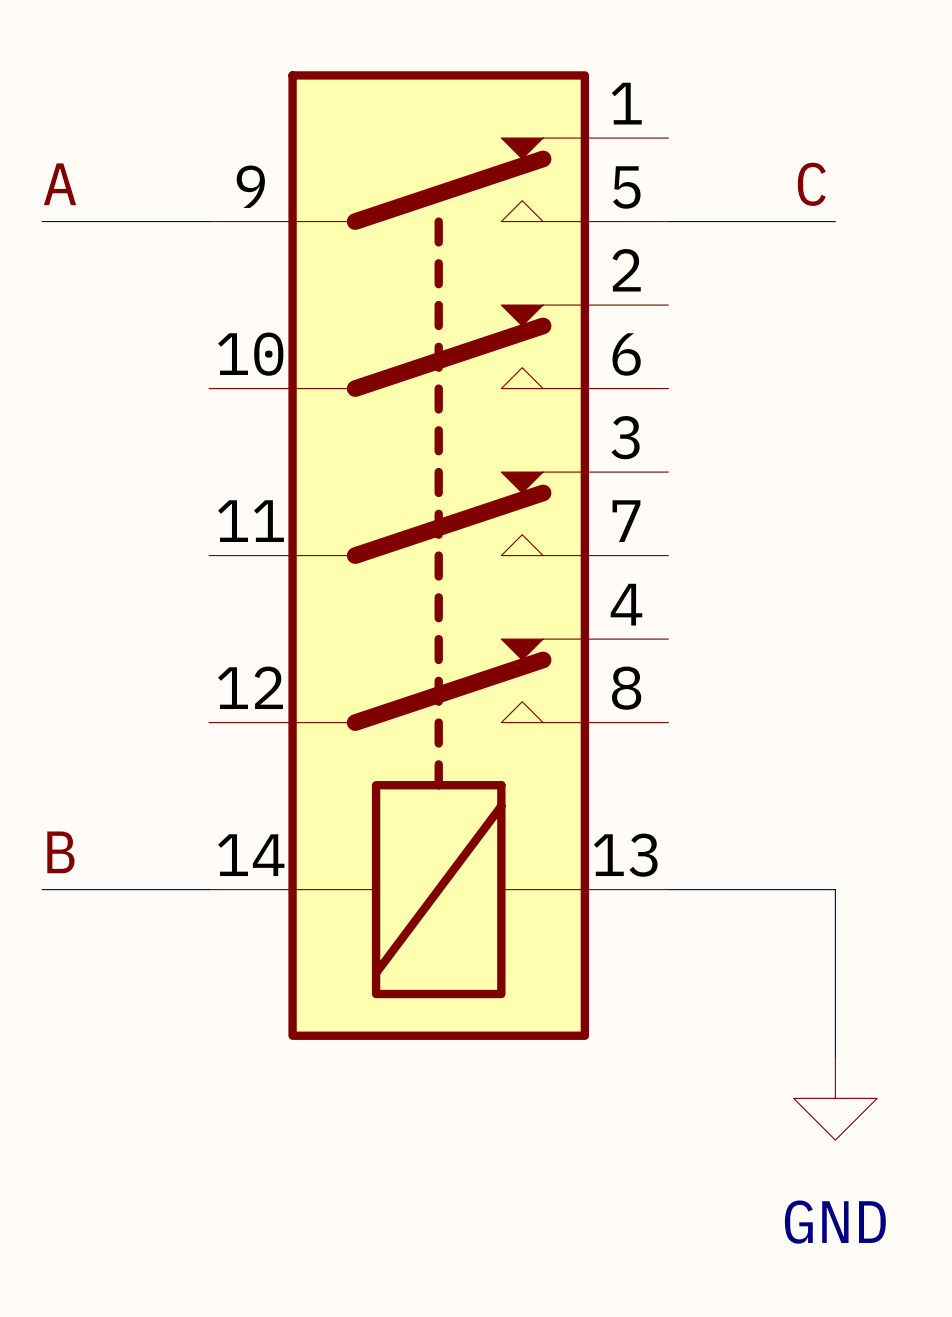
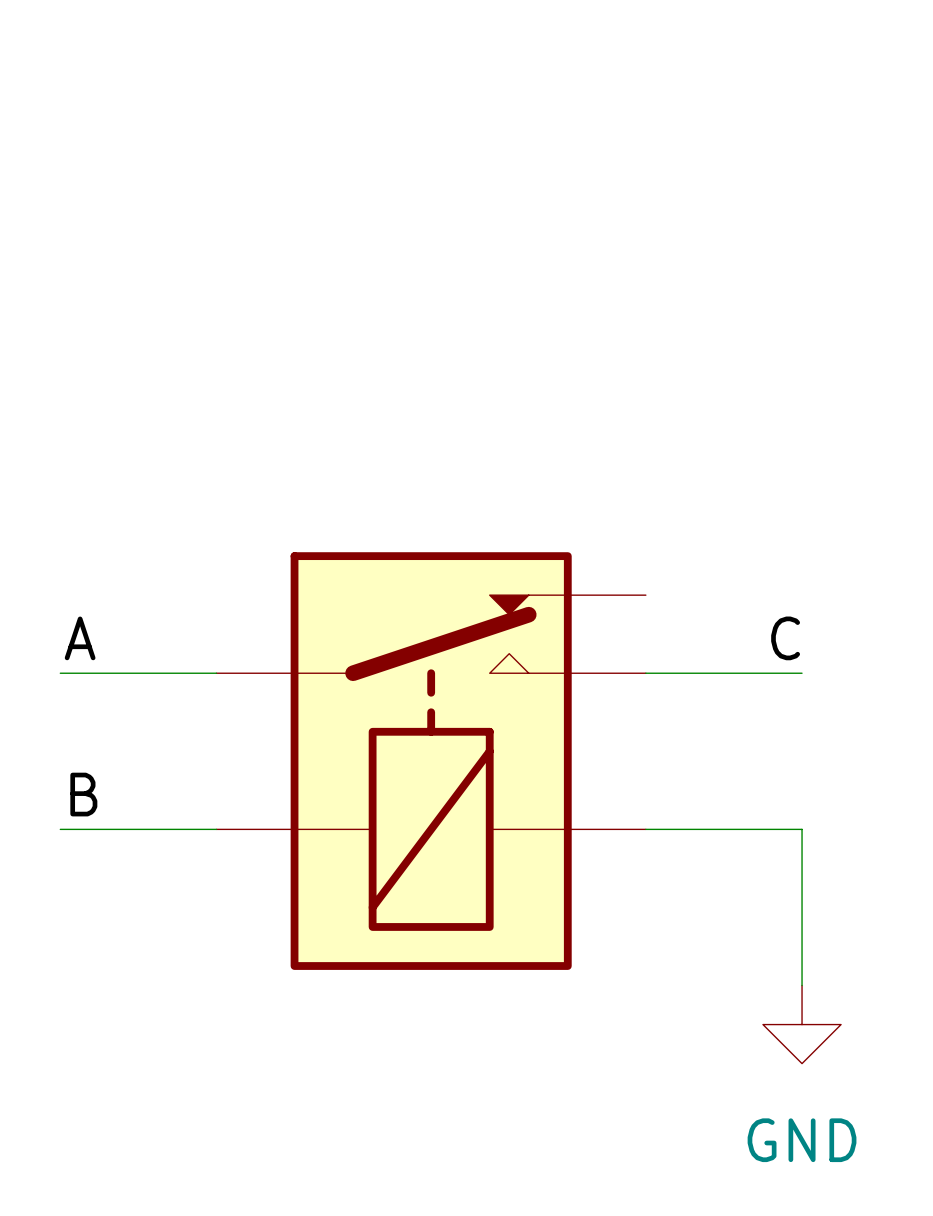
label position: A (60, 184) -> A (80, 638)
label position: C (811, 184) -> C (785, 638)
wire: (42, 221) (209, 221) -> (60, 673) (216, 673)
wire: (668, 221) (835, 221) -> (645, 673) (802, 673)
part: (438, 555) -> none
part: none -> (431, 761)

